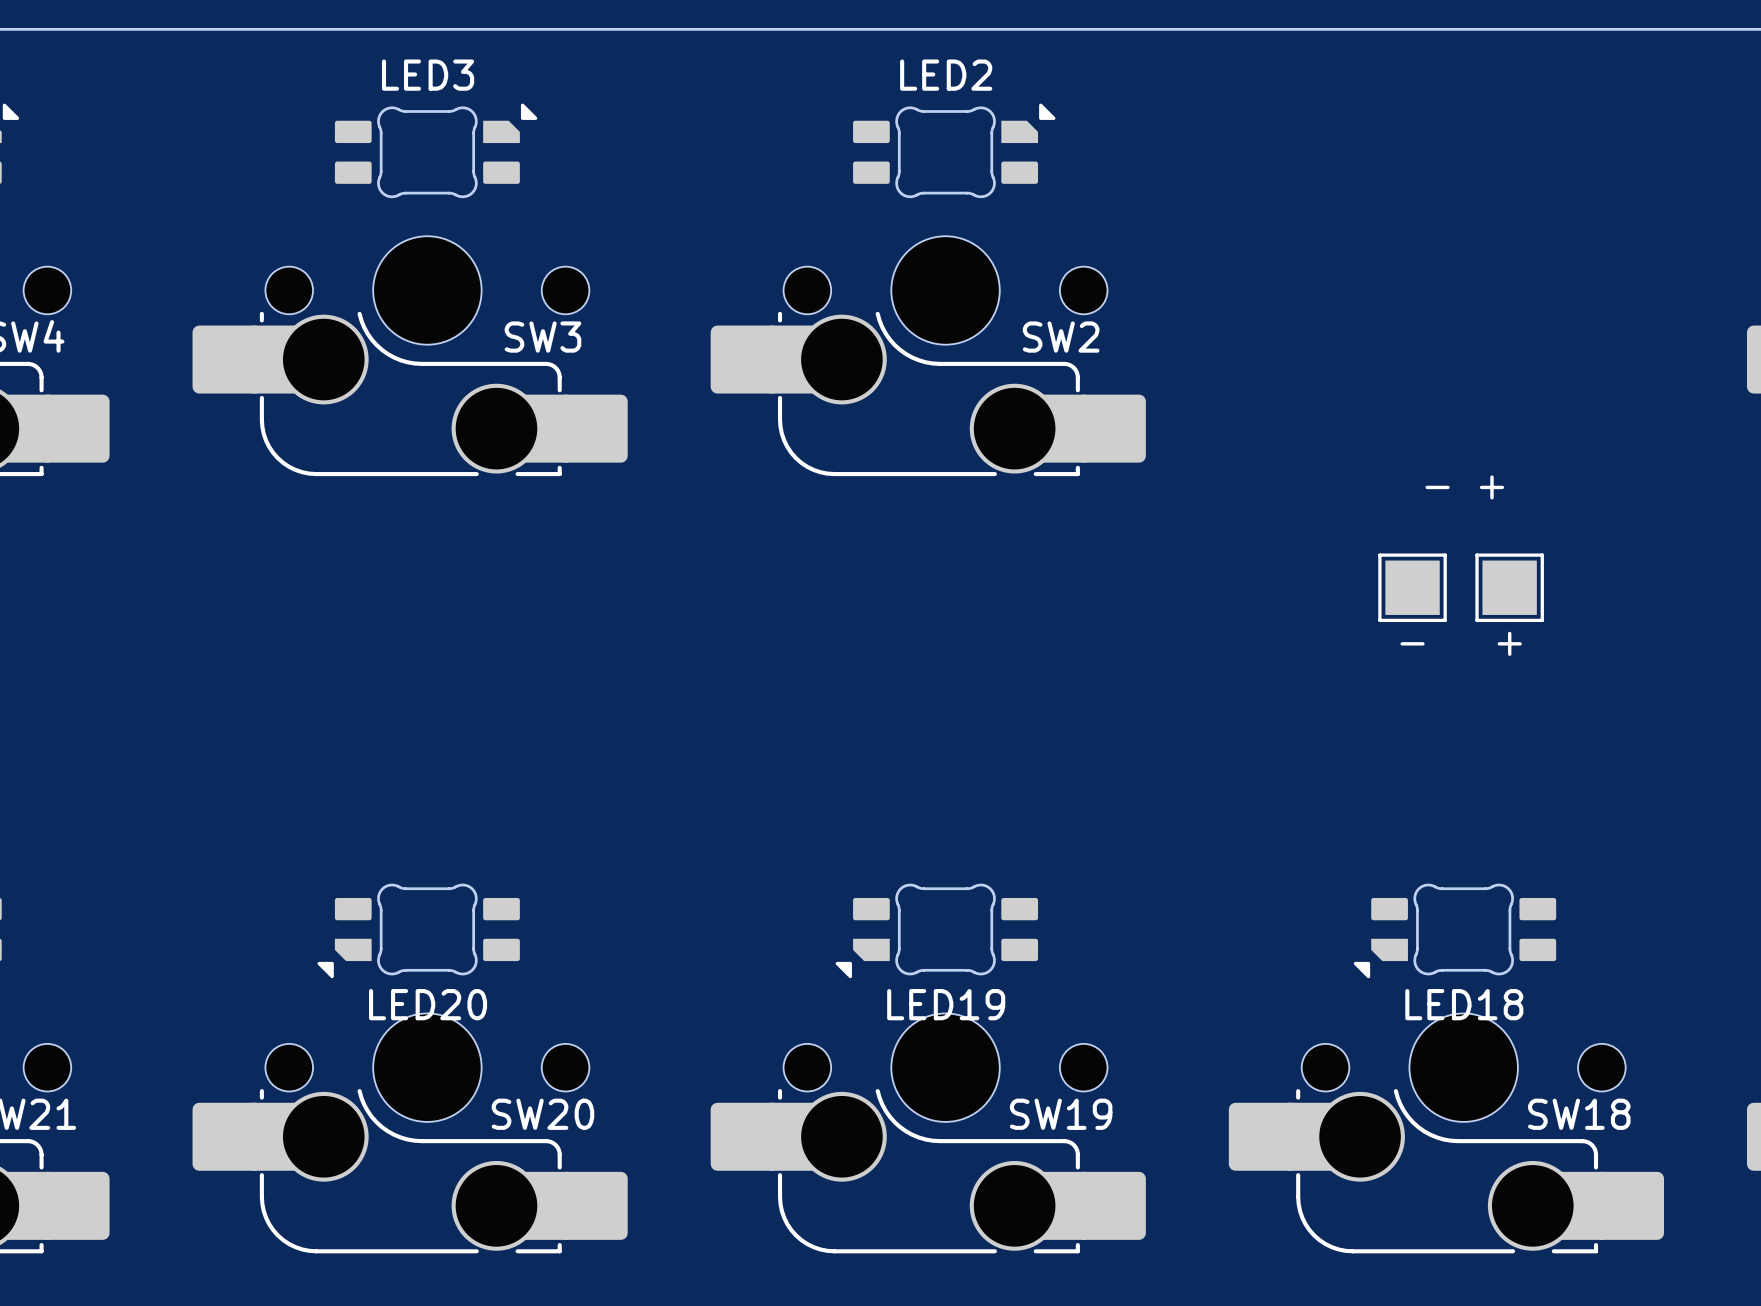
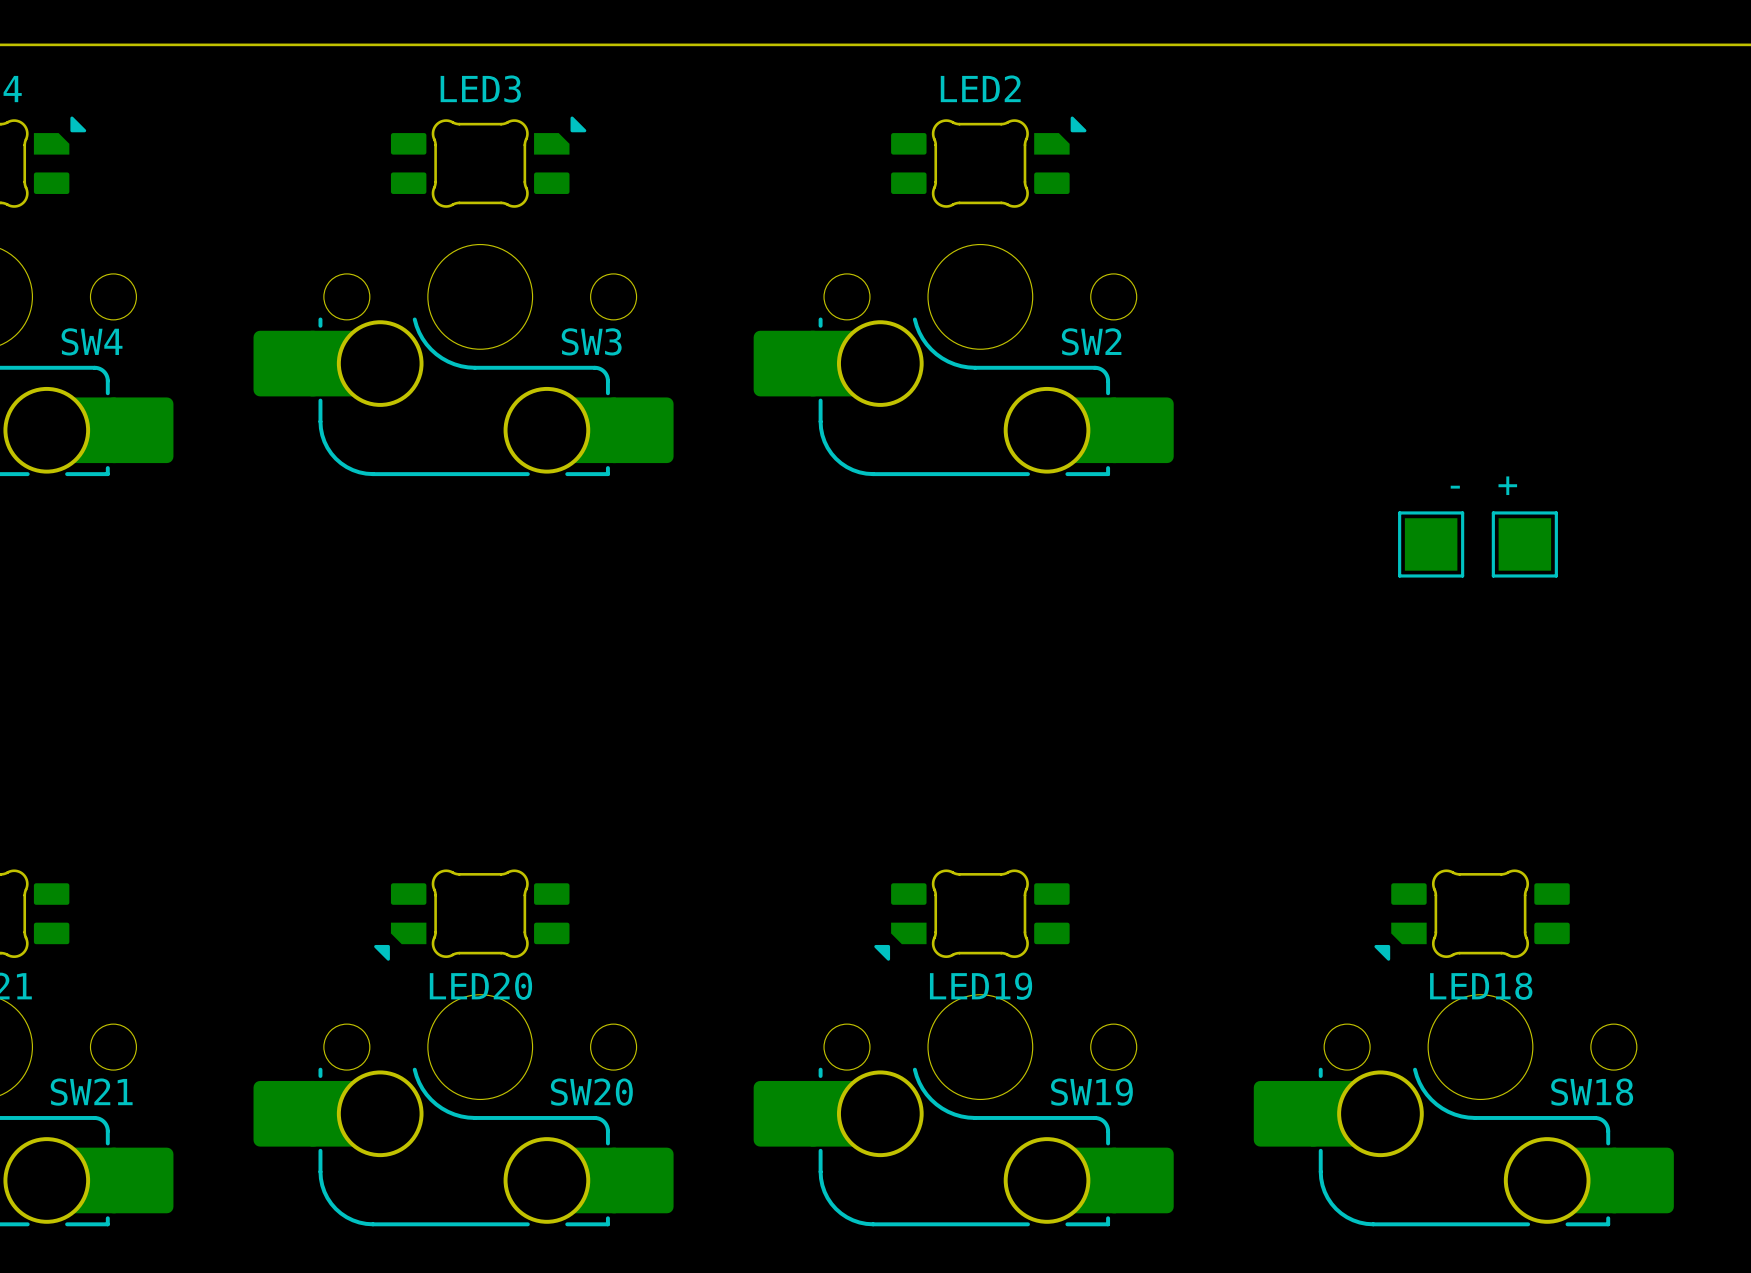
part position: (1412, 587) -> (1431, 544)
part position: (1509, 587) -> (1524, 544)
text: - (1412, 643) -> none
text: + (1509, 643) -> none

